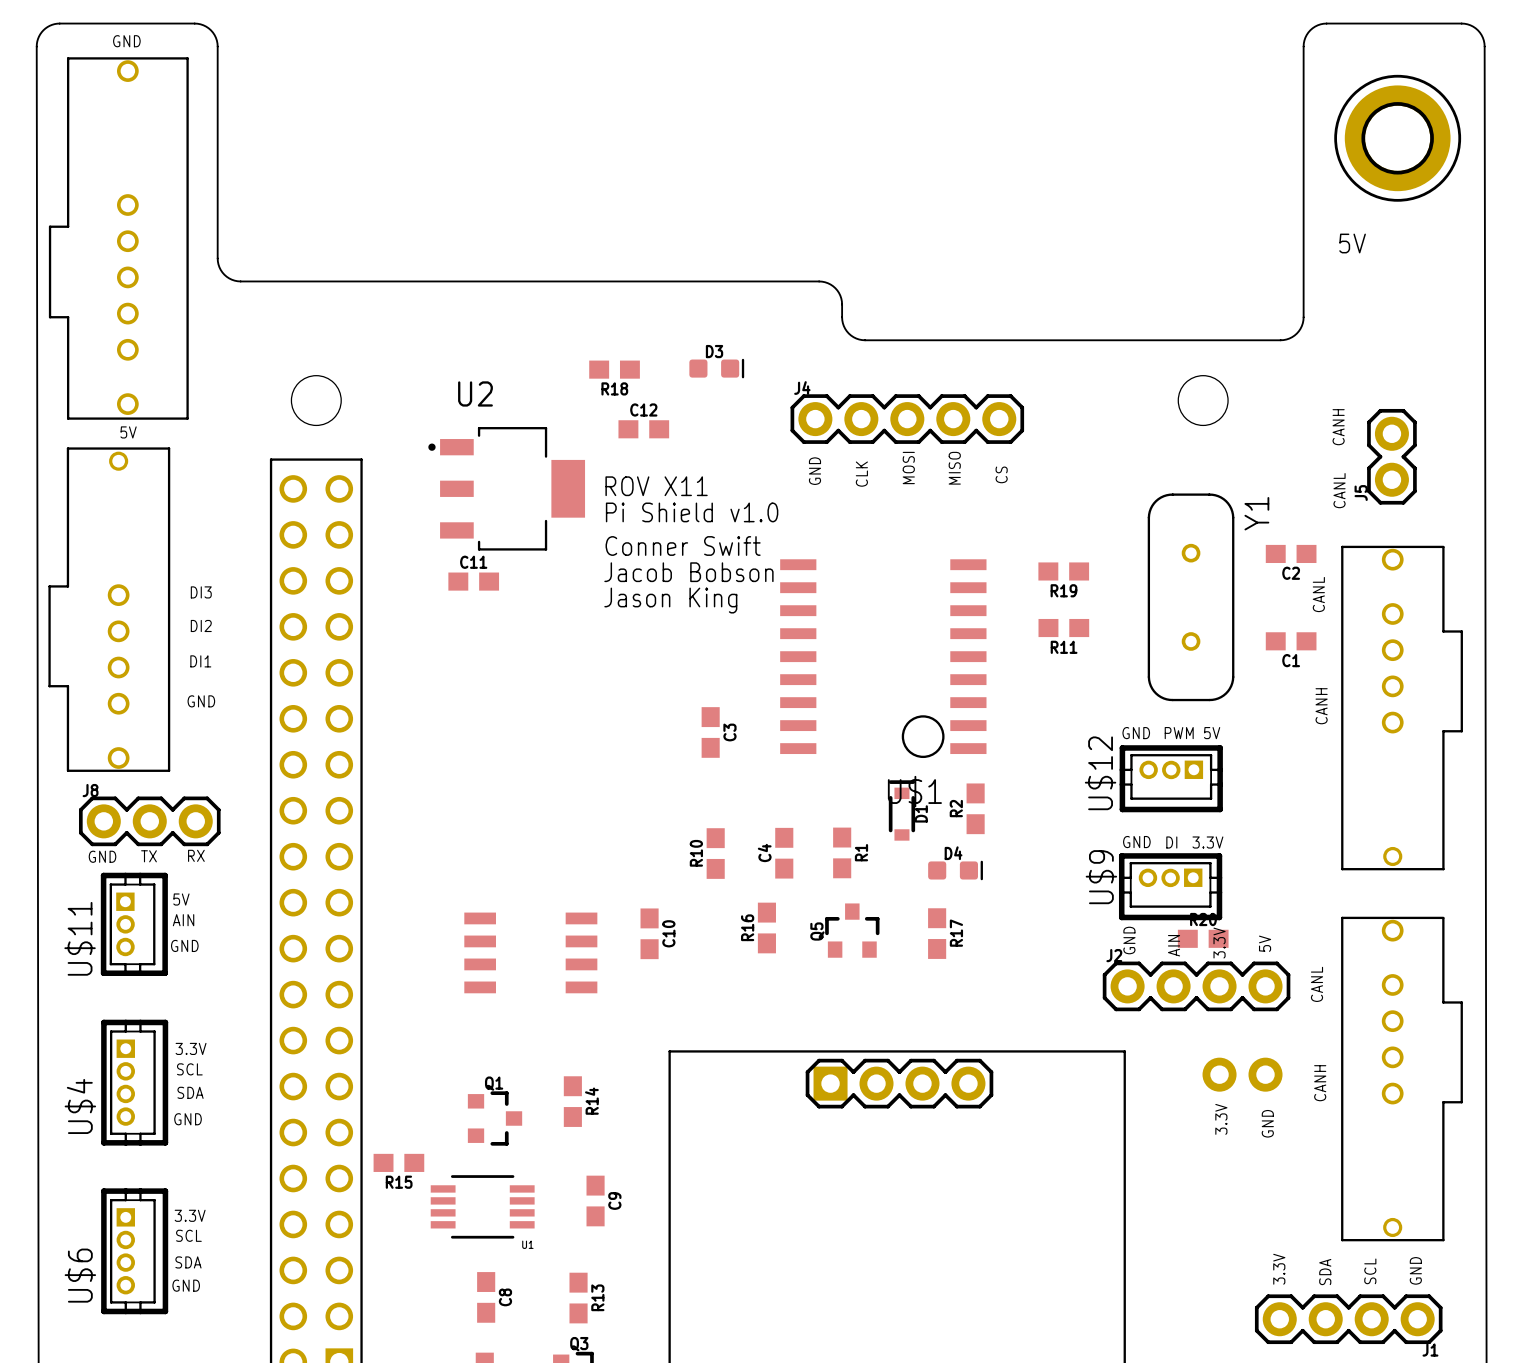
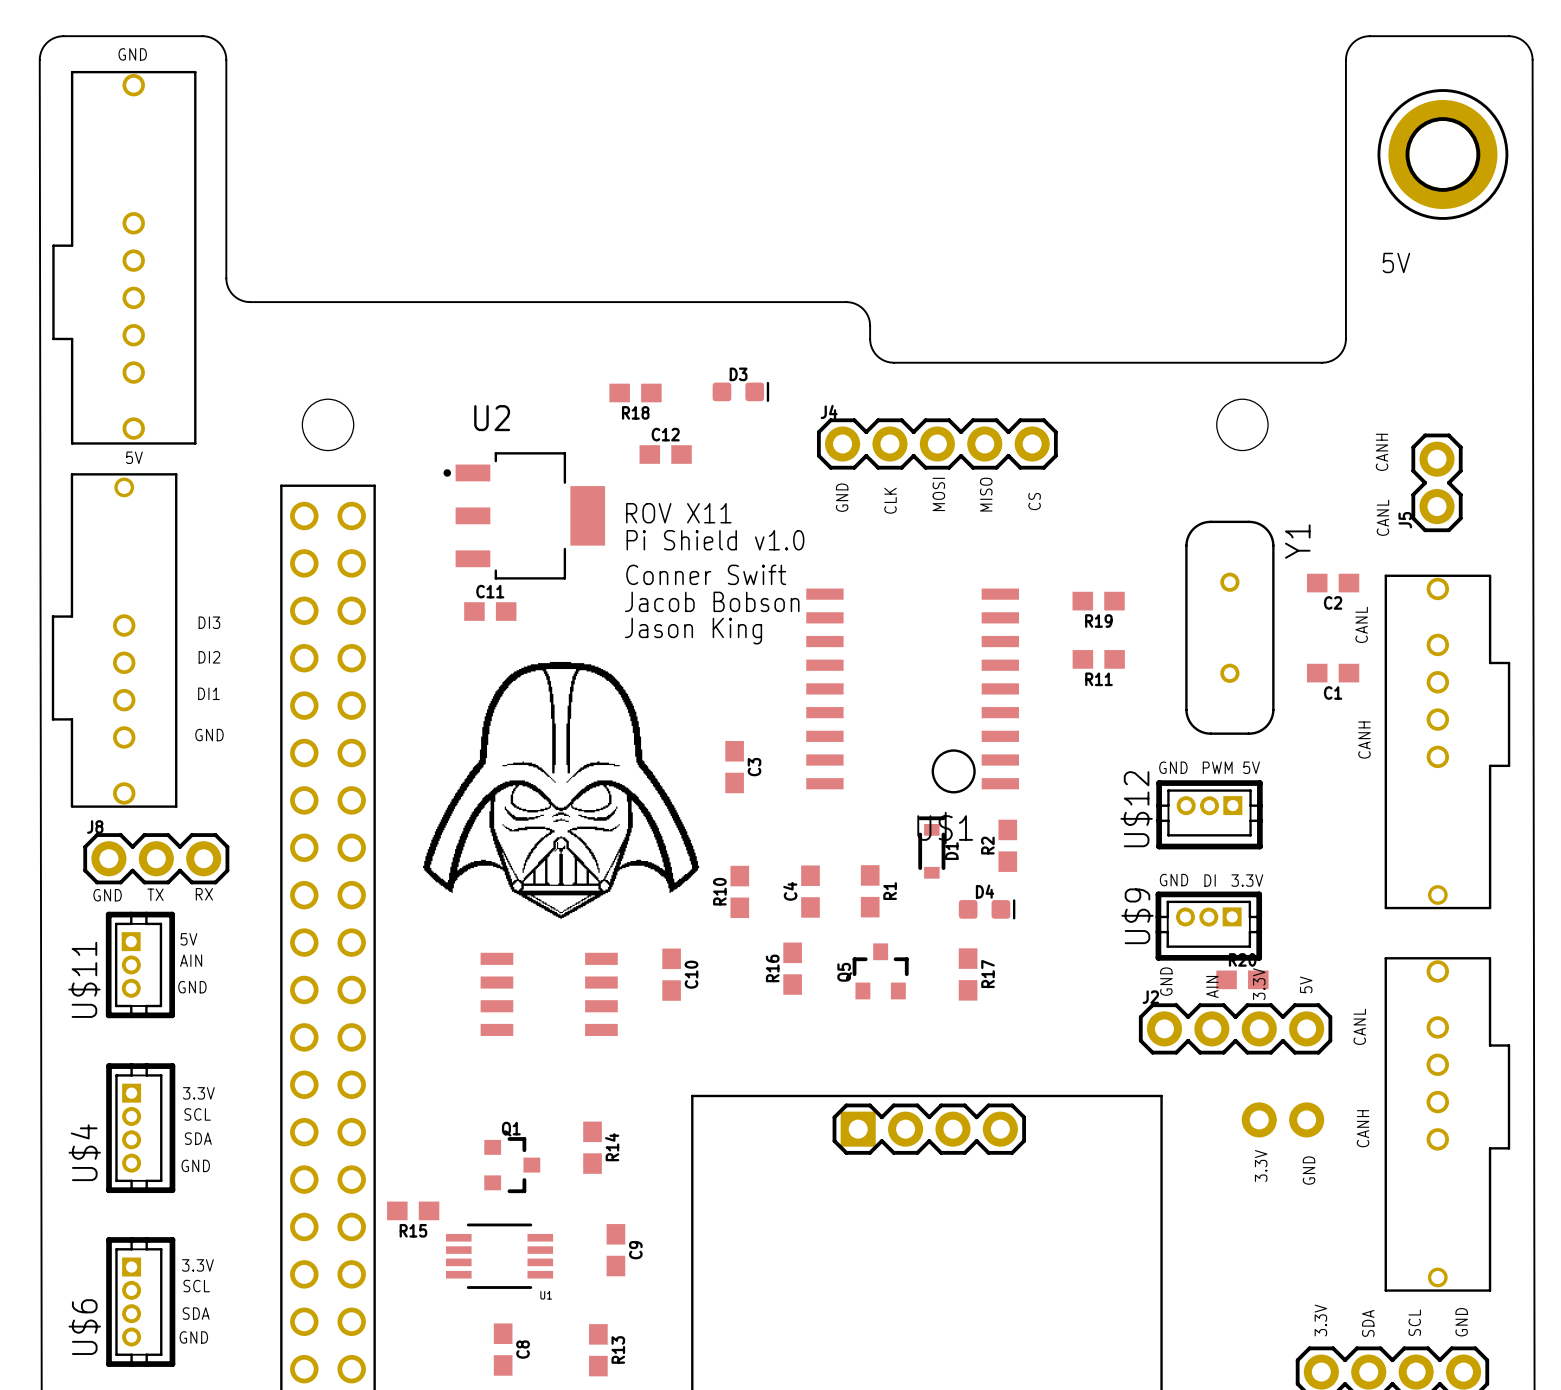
drawing: none -> [423, 661, 700, 920]

